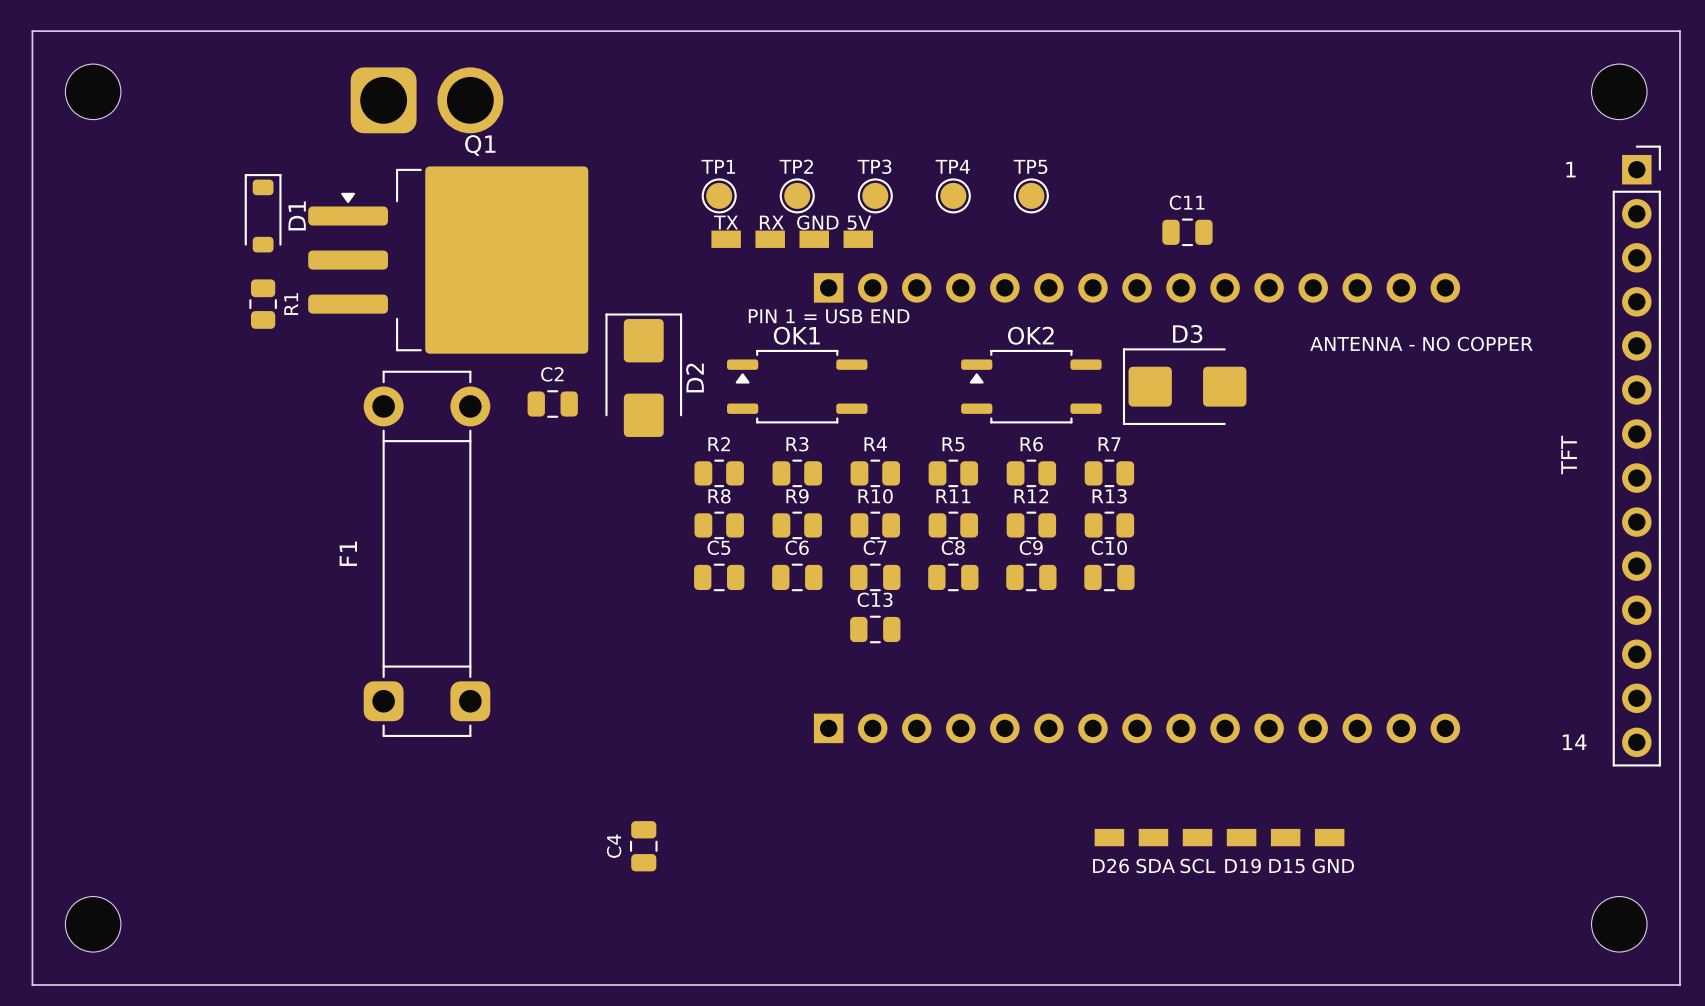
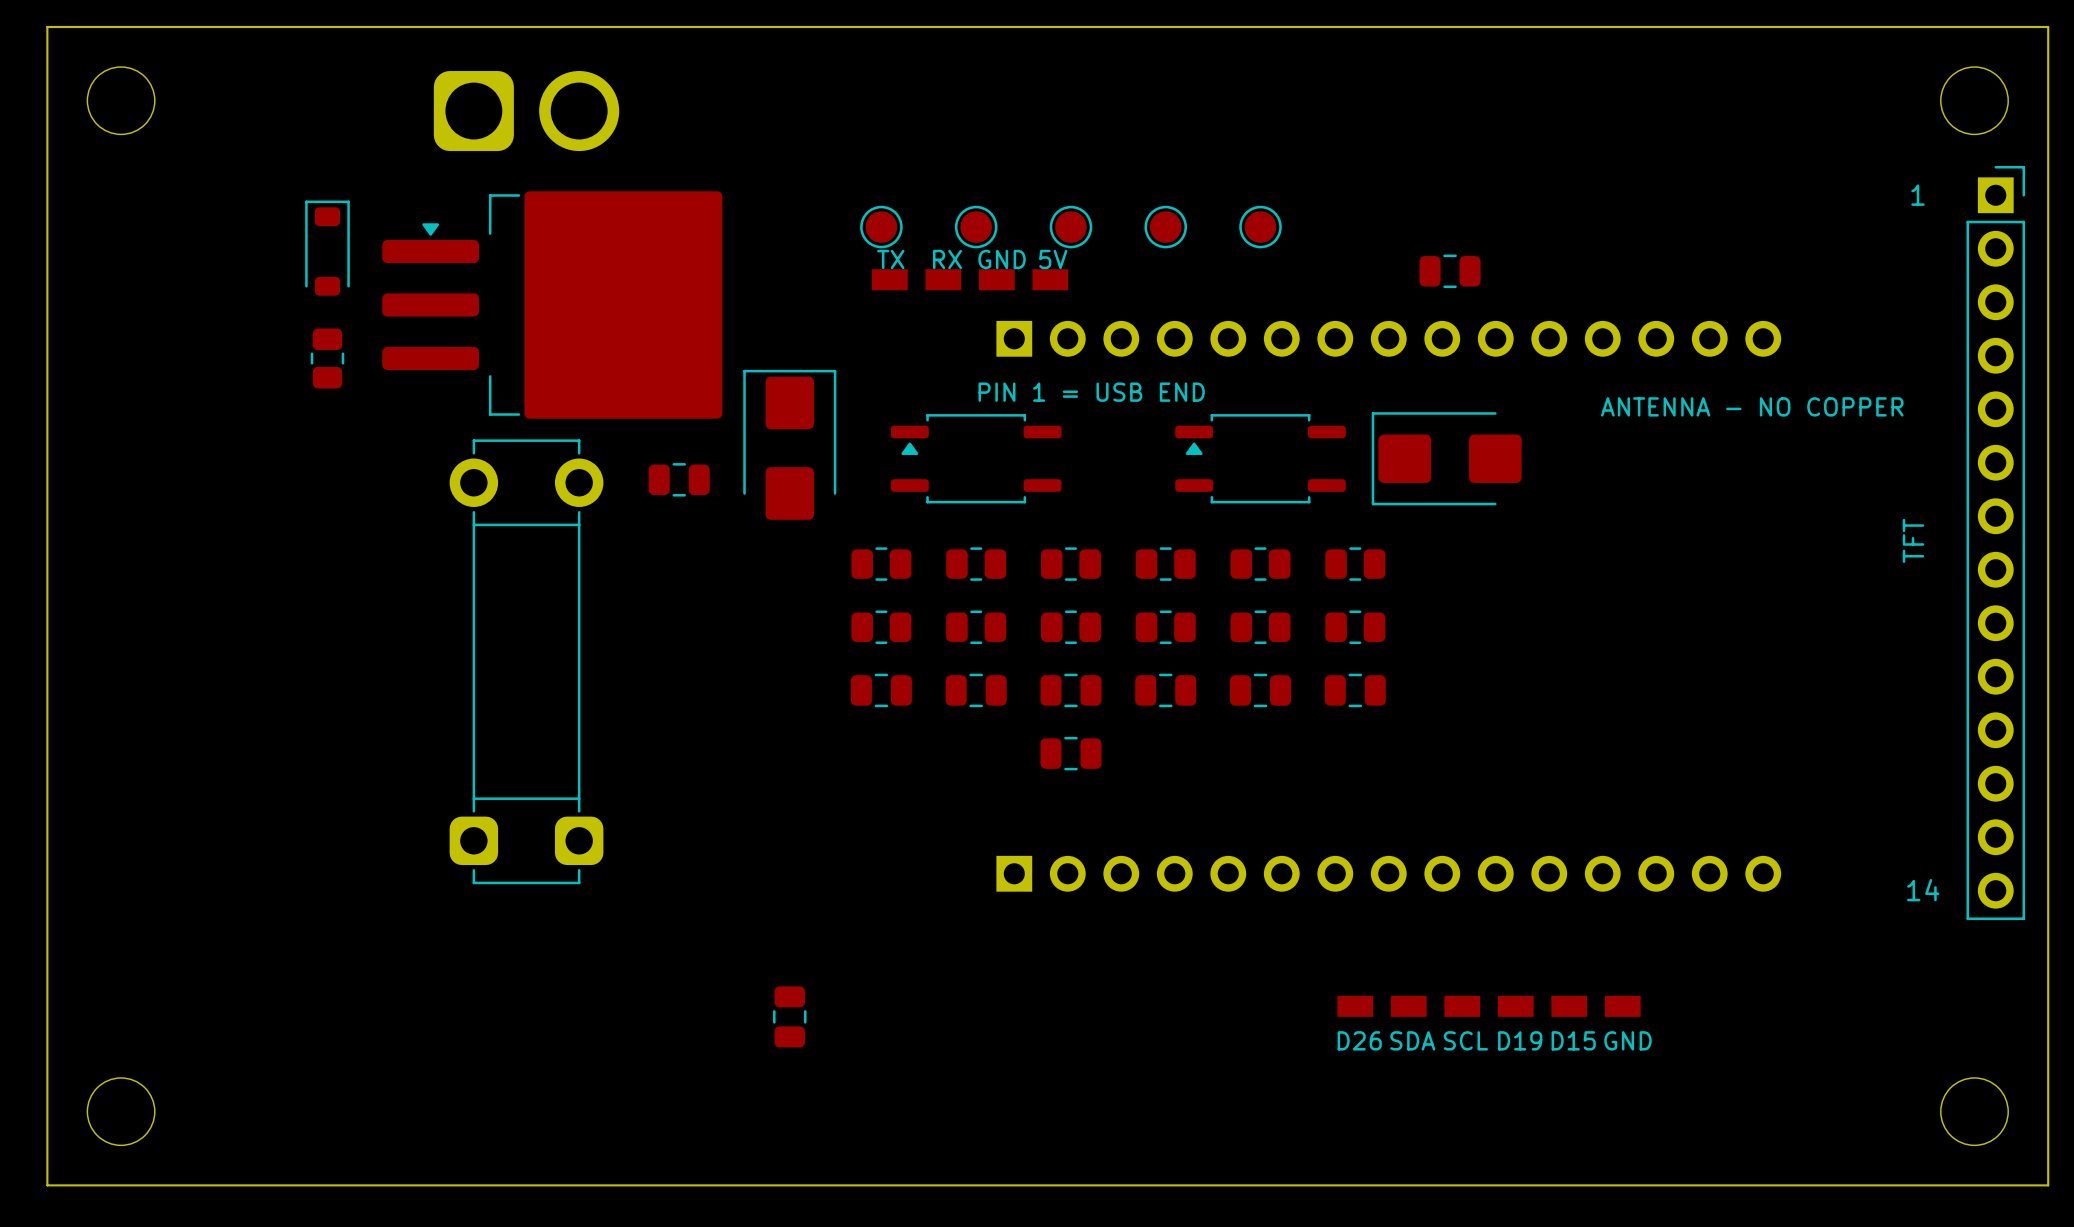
Q1 name: Q1 (480, 145) -> none
TP1 name: TP1 (718, 166) -> none
TP2 name: TP2 (796, 166) -> none
TP3 name: TP3 (874, 166) -> none
TP4 name: TP4 (952, 166) -> none
TP5 name: TP5 (1030, 166) -> none
C11 name: C11 (1187, 202) -> none
D1 name: D1 (297, 215) -> none
R1 name: R1 (291, 304) -> none
text position: PIN 1 = USB END (829, 316) -> PIN 1 = USB END (1091, 392)
D3 name: D3 (1187, 334) -> none
OK1 name: OK1 (796, 335) -> none
OK2 name: OK2 (1030, 335) -> none
C2 name: C2 (552, 374) -> none
D2 name: D2 (694, 378) -> none
R2 name: R2 (719, 444) -> none
R3 name: R3 (797, 444) -> none
R4 name: R4 (875, 444) -> none
R5 name: R5 (953, 444) -> none
R6 name: R6 (1031, 444) -> none
R7 name: R7 (1109, 444) -> none
R8 name: R8 (719, 496) -> none
R9 name: R9 (797, 496) -> none
R10 name: R10 (875, 496) -> none
R11 name: R11 (953, 496) -> none
R12 name: R12 (1031, 496) -> none
R13 name: R13 (1109, 496) -> none
C5 name: C5 (718, 547) -> none
C6 name: C6 (797, 547) -> none
C7 name: C7 (875, 547) -> none
C8 name: C8 (953, 547) -> none
C9 name: C9 (1031, 547) -> none
C10 name: C10 (1109, 547) -> none
F1 name: F1 (348, 553) -> none
C13 name: C13 (875, 599) -> none
C4 name: C4 (614, 846) -> none

